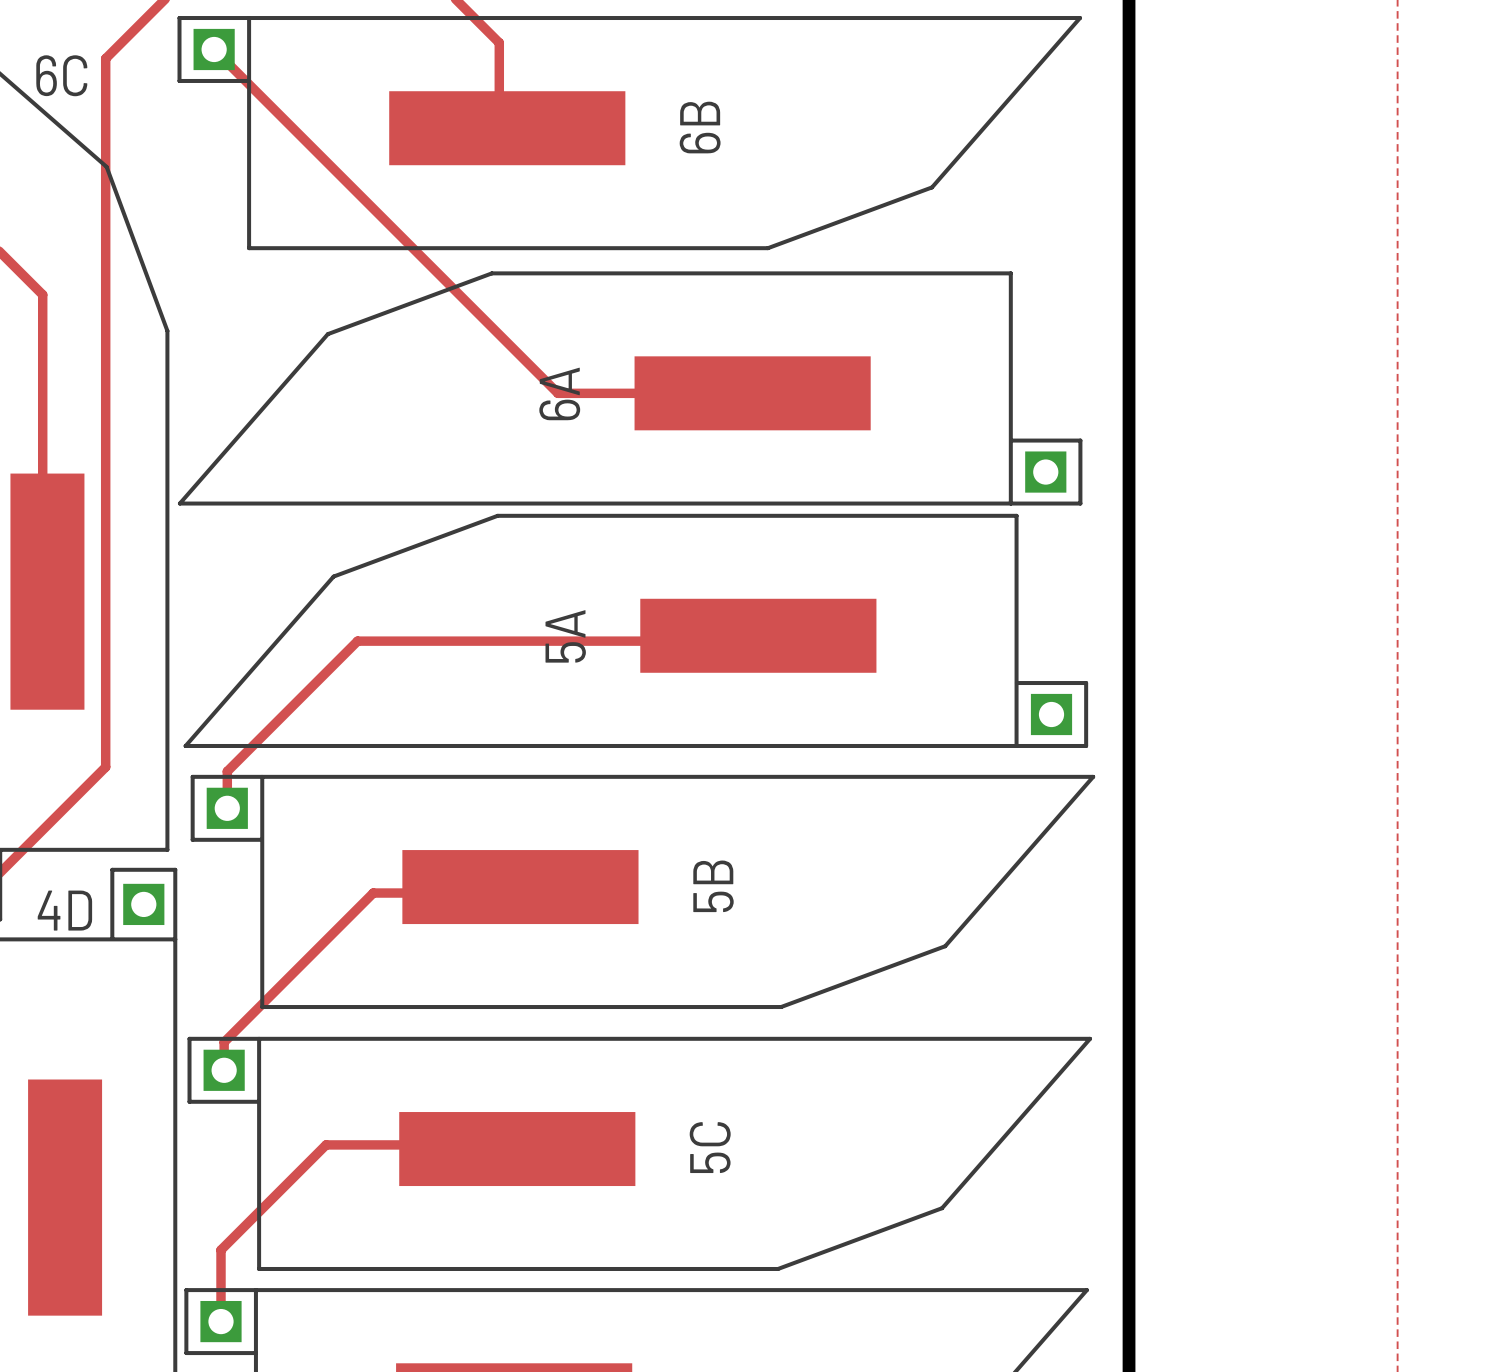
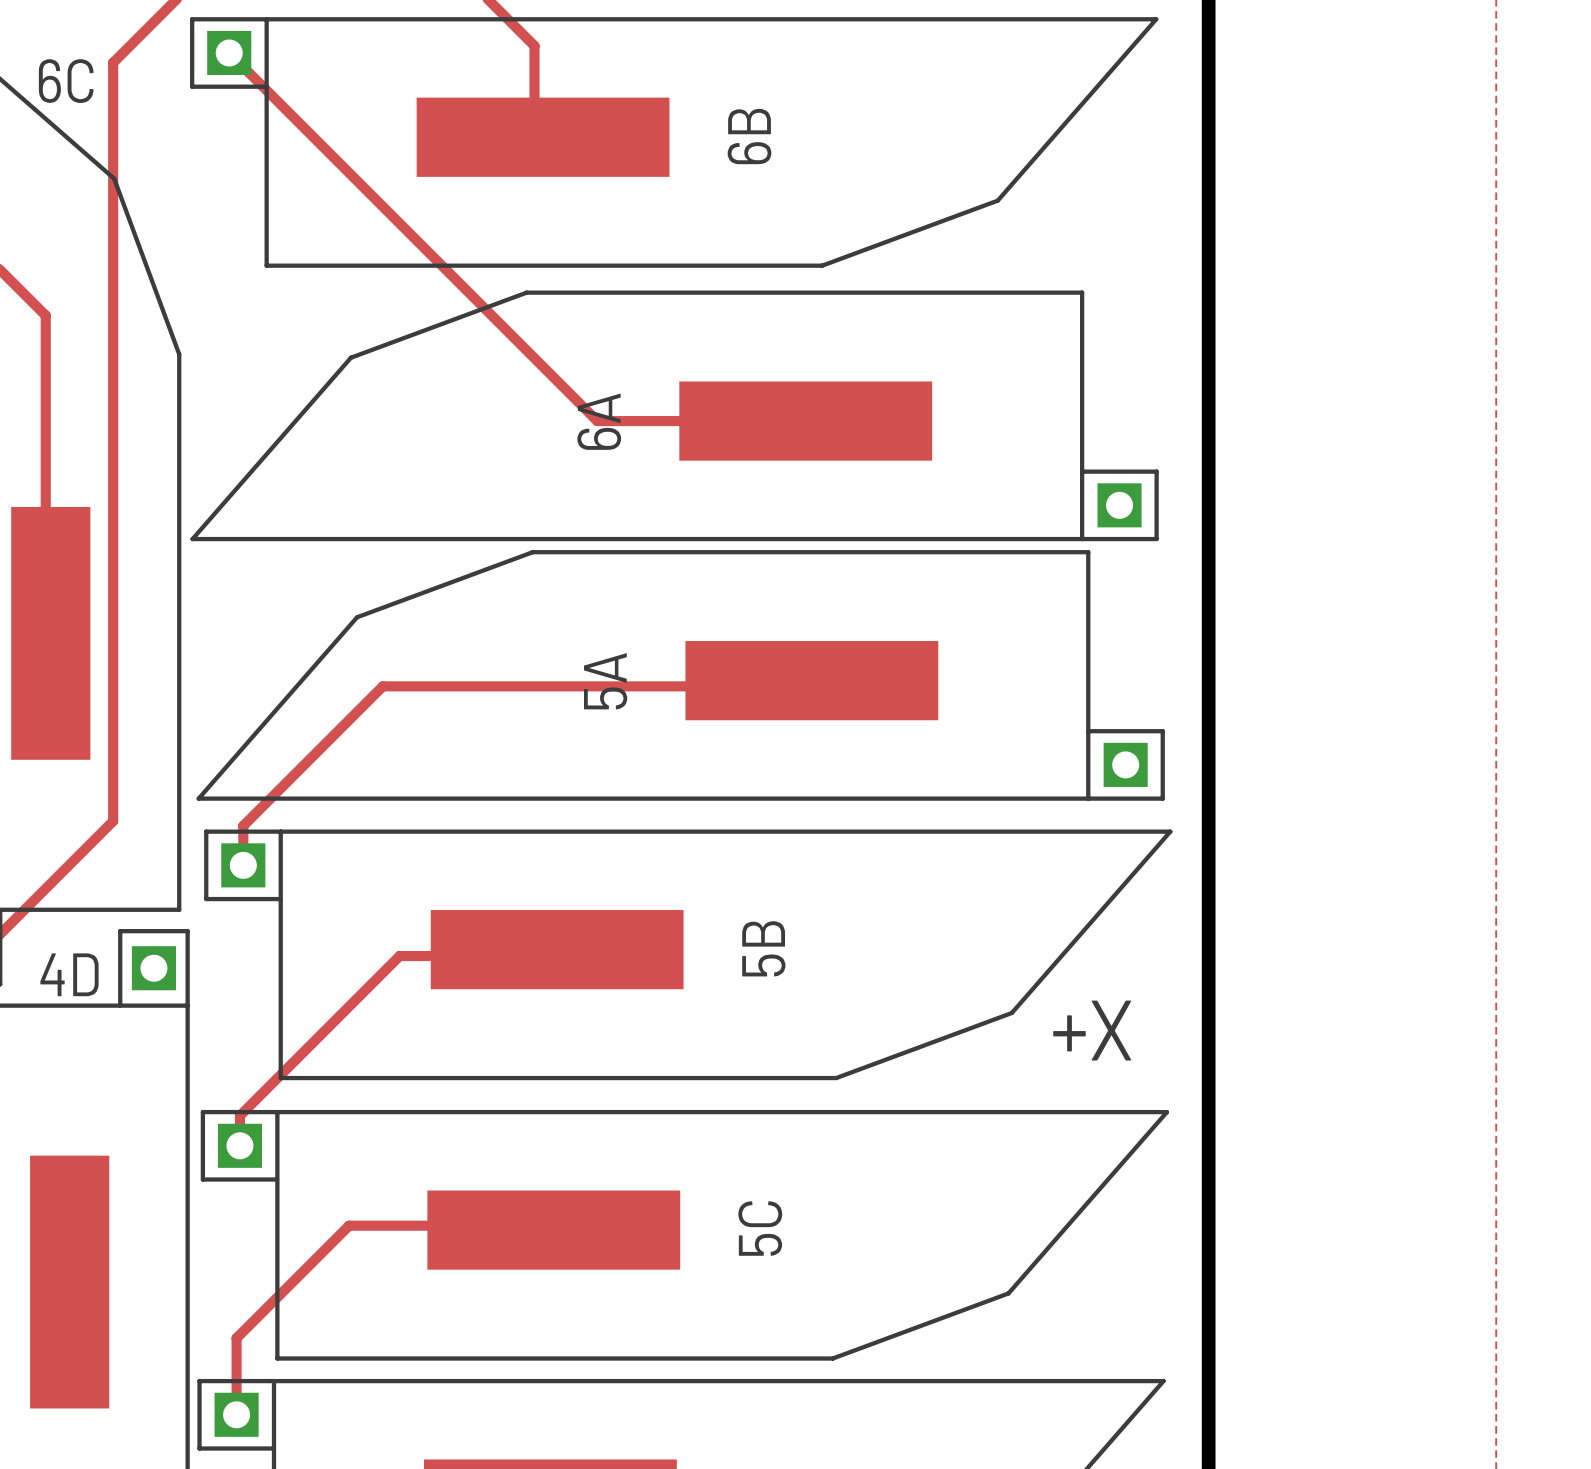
text: none -> +X (1092, 1030)

